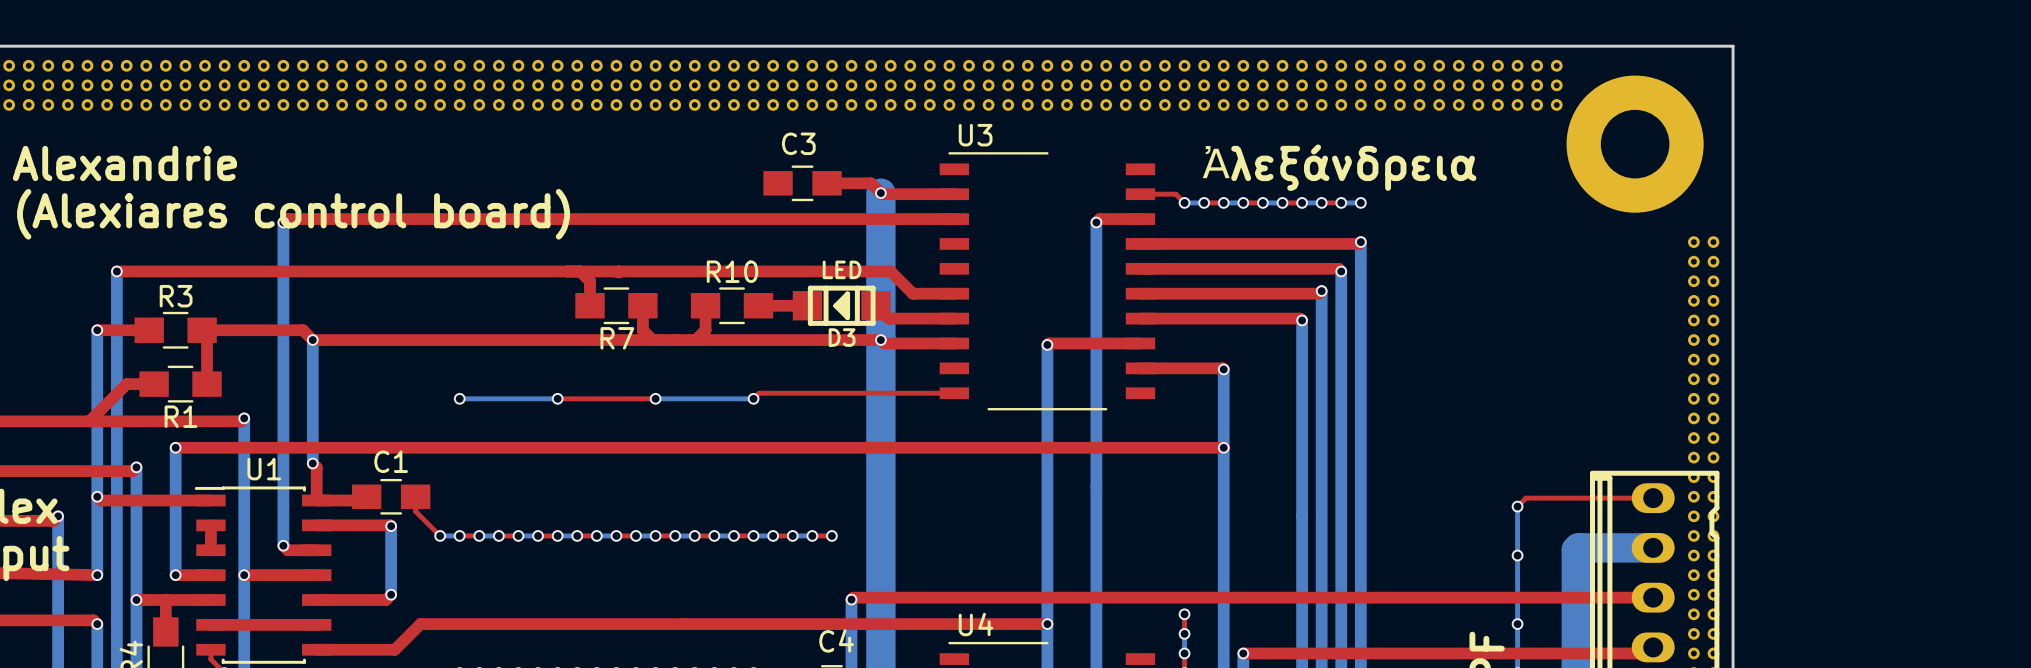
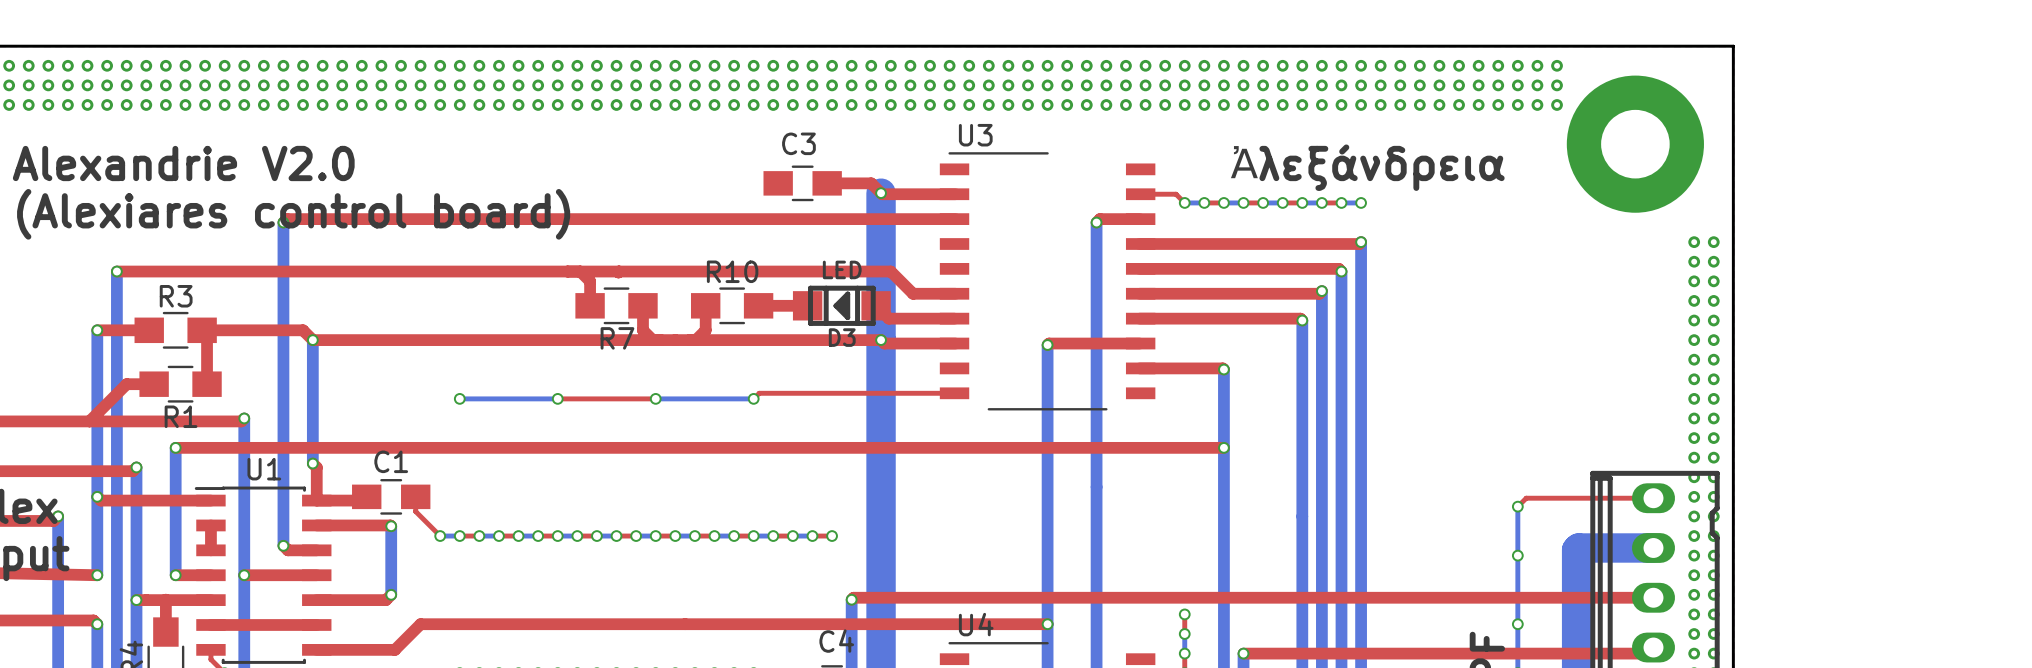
text: Alexandrie Ἀλεξάνδρεια (744, 166) -> Alexandrie V2.0 Ἀλεξάνδρεια (758, 167)

